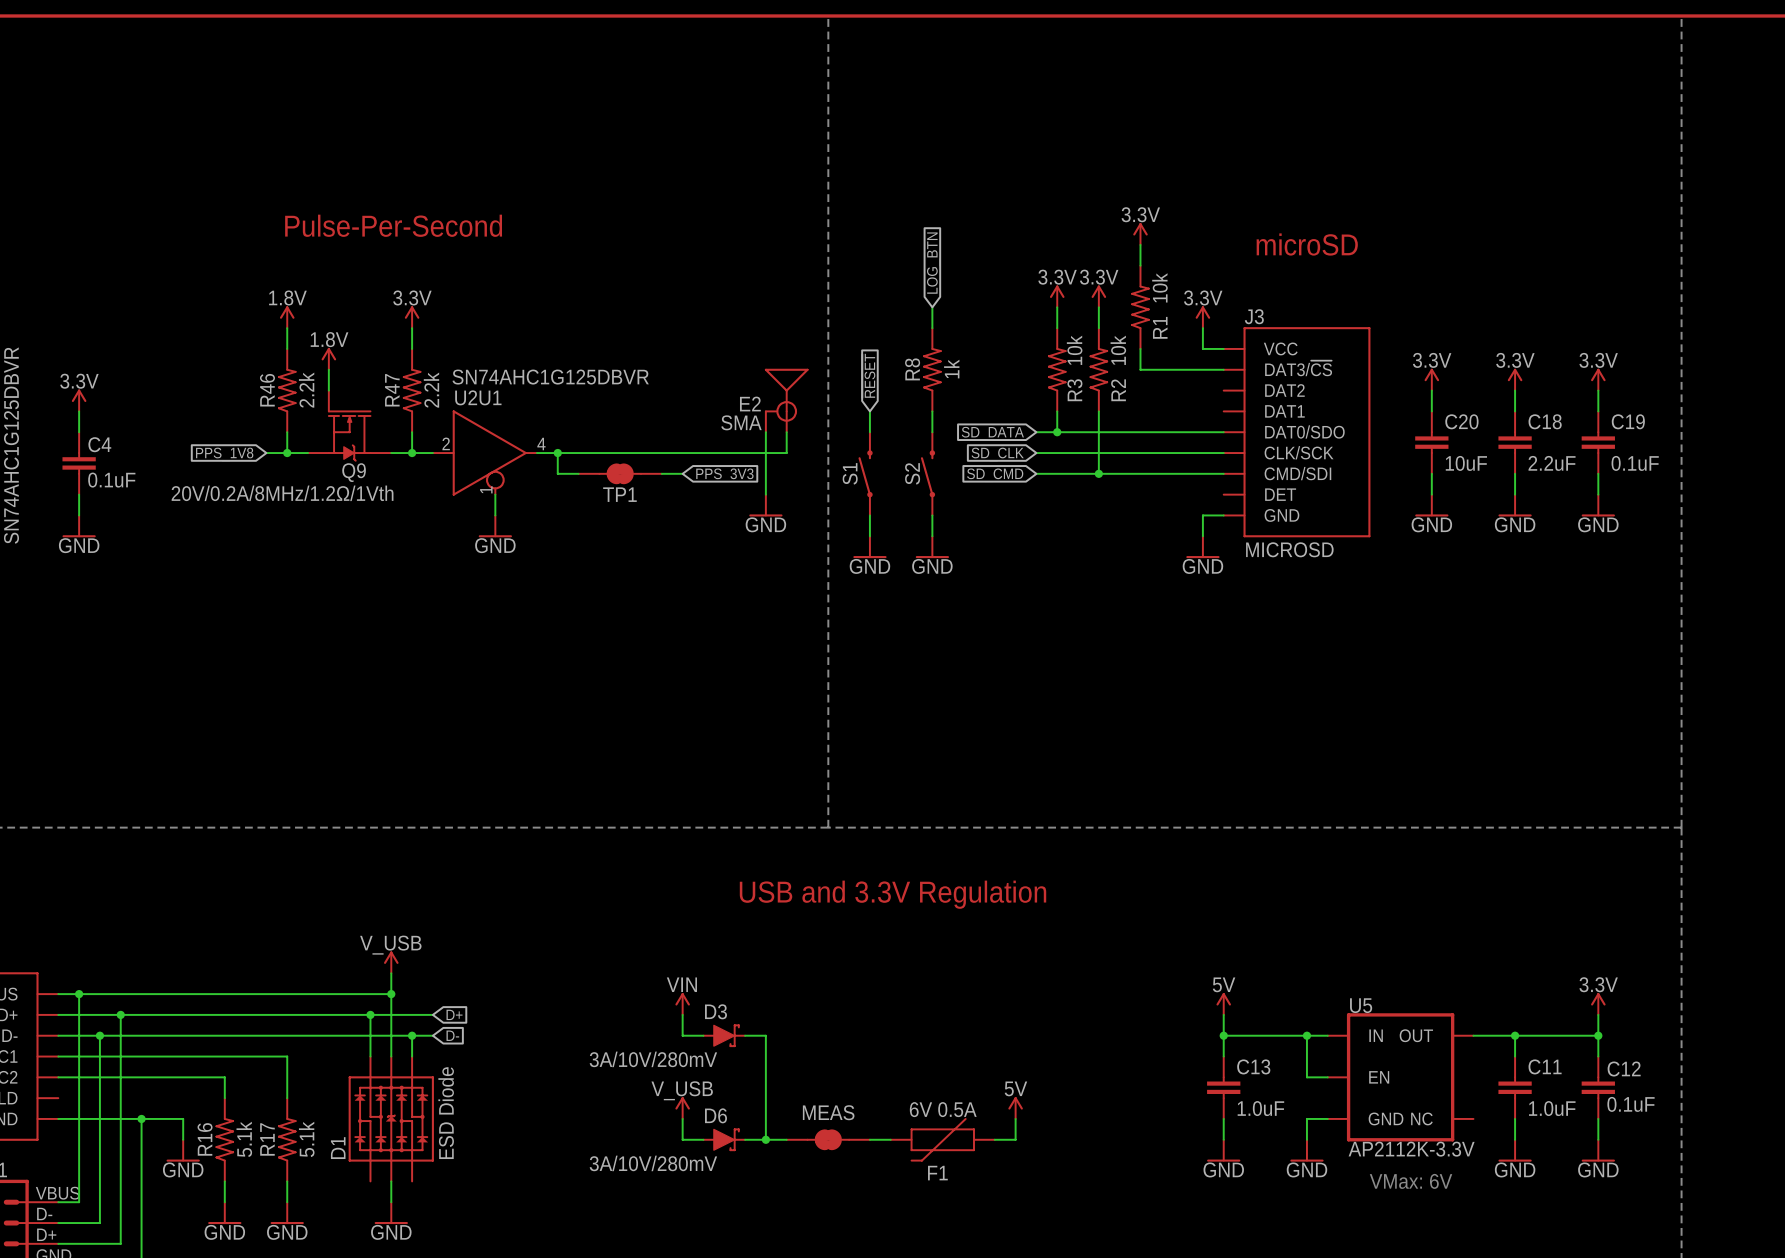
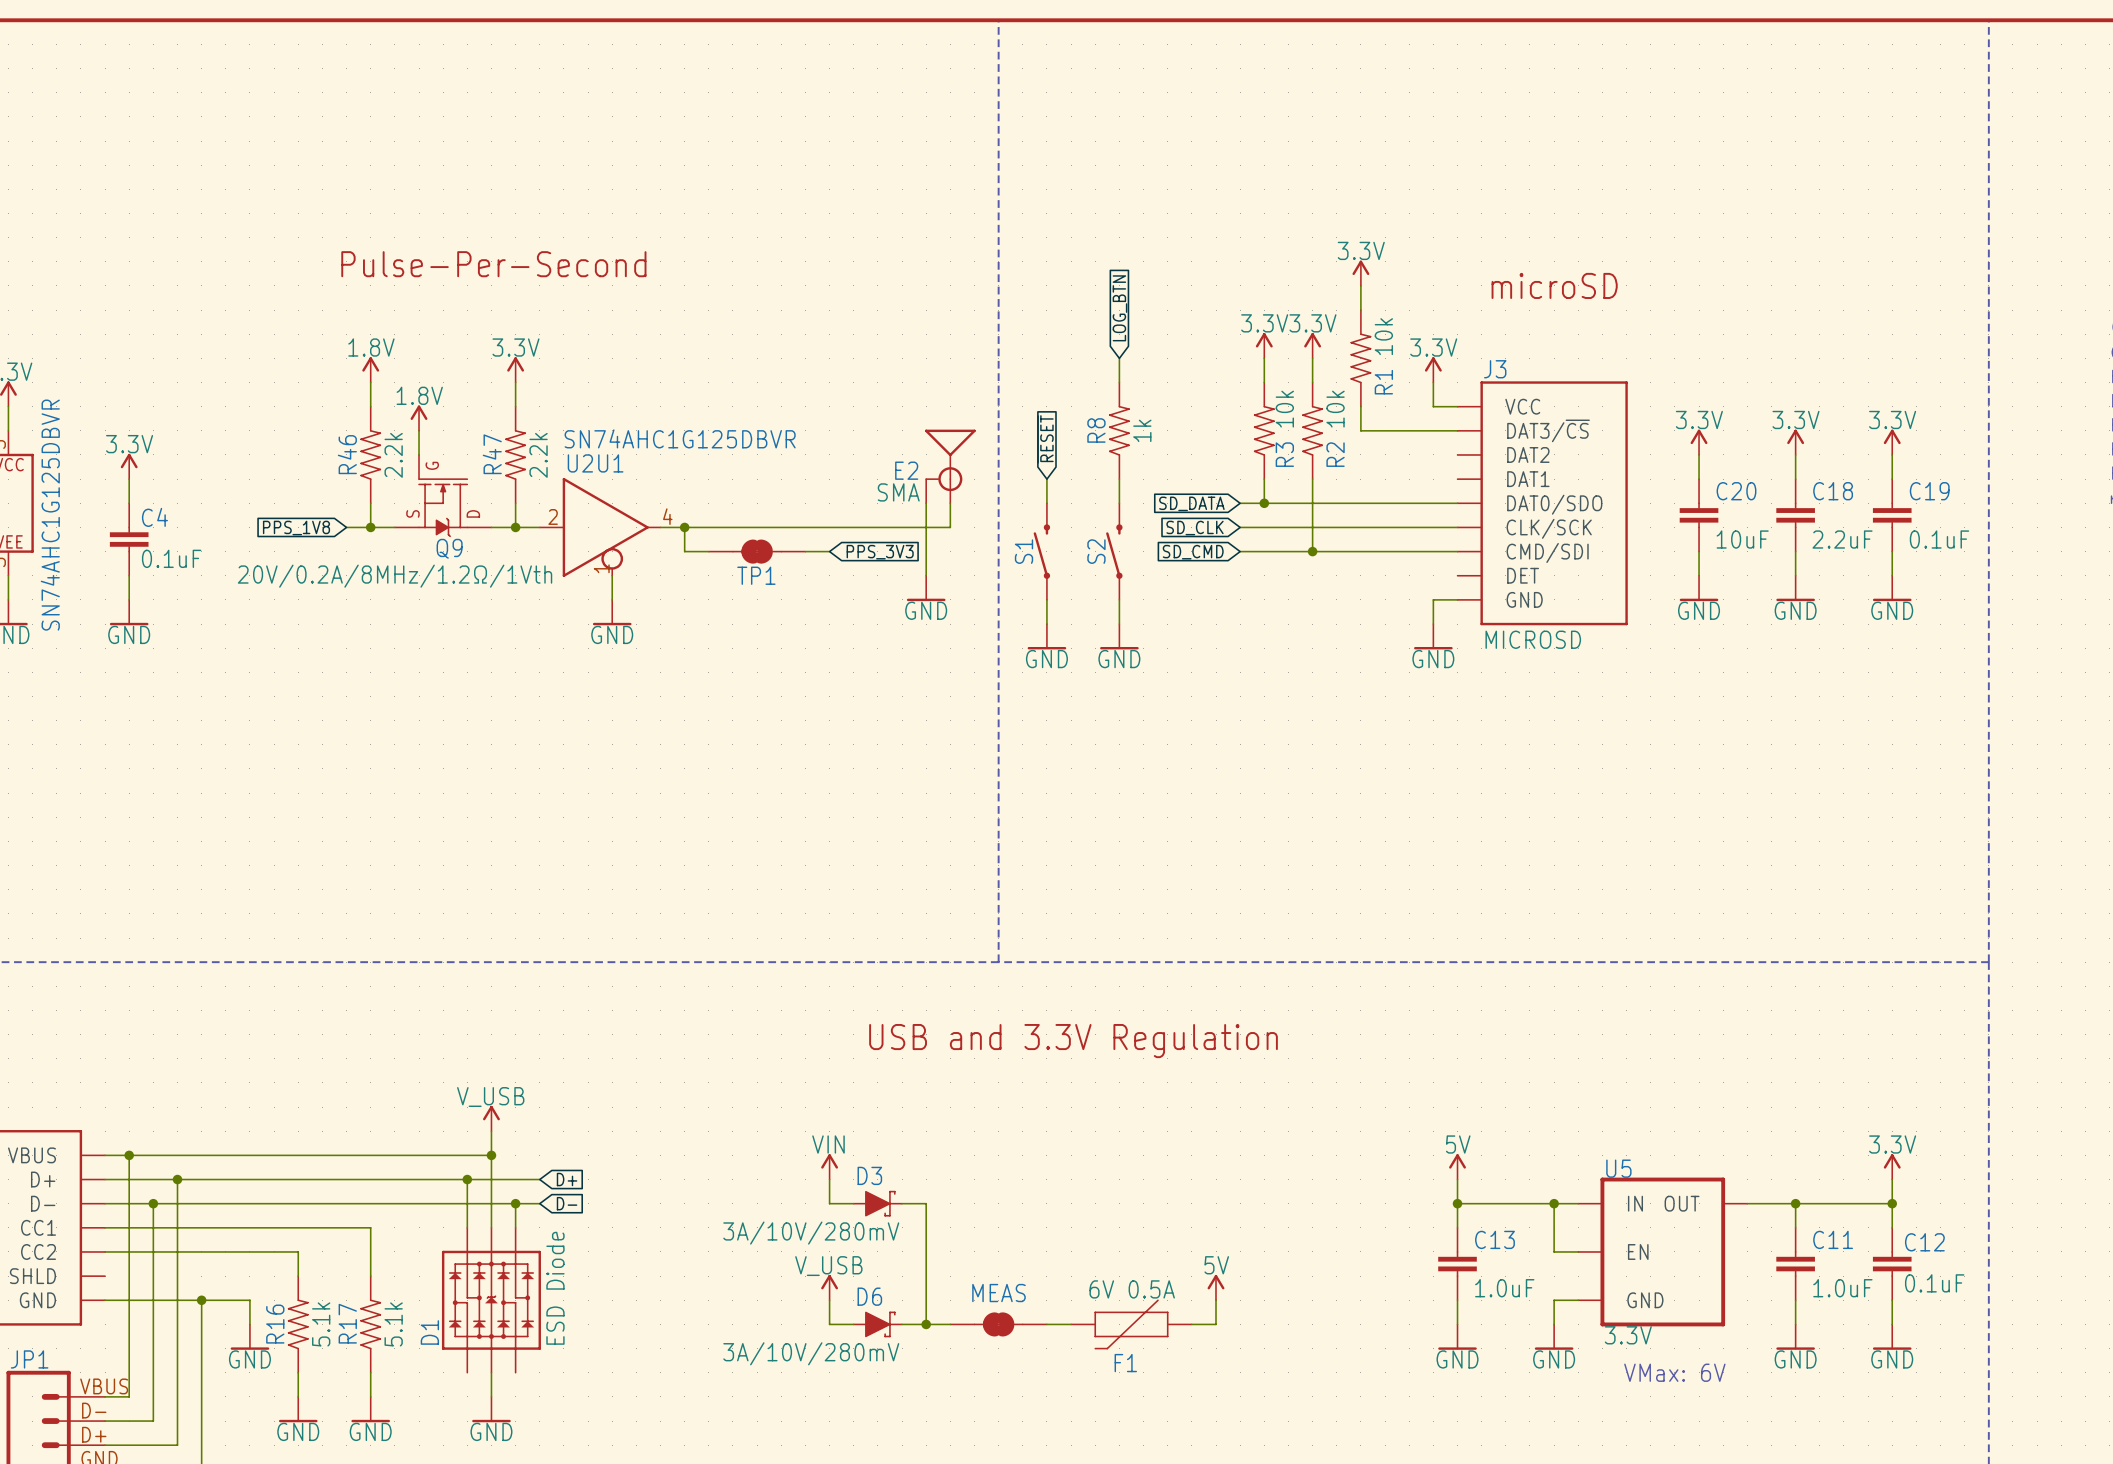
Q9 text: none -> G (432, 465)
Q9 text: none -> S (412, 513)
Q9 text: none -> D (473, 513)
U5 symbol: [1327, 1013, 1474, 1142] -> [1578, 1177, 1748, 1327]
U5 value: AP2112K-3.3V (1411, 1149) -> 3.3V (1628, 1335)

